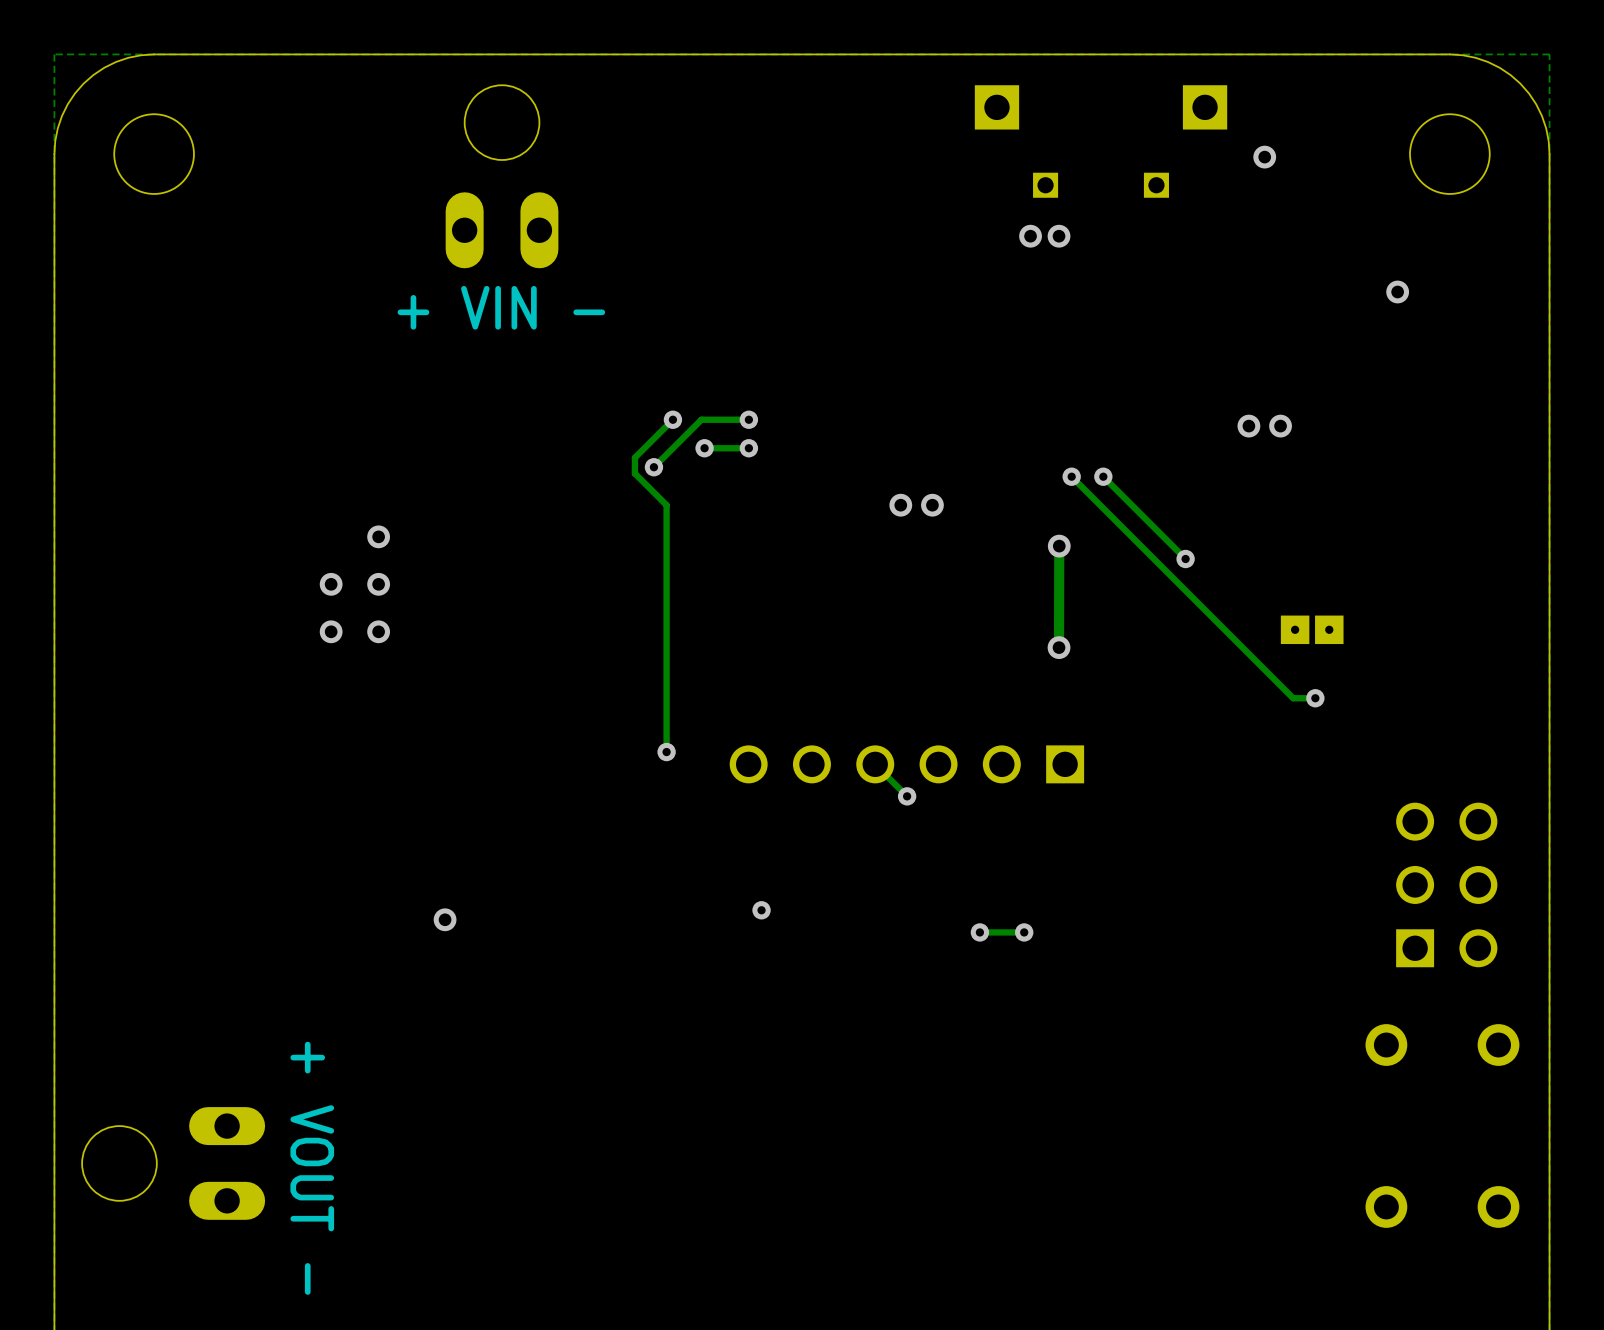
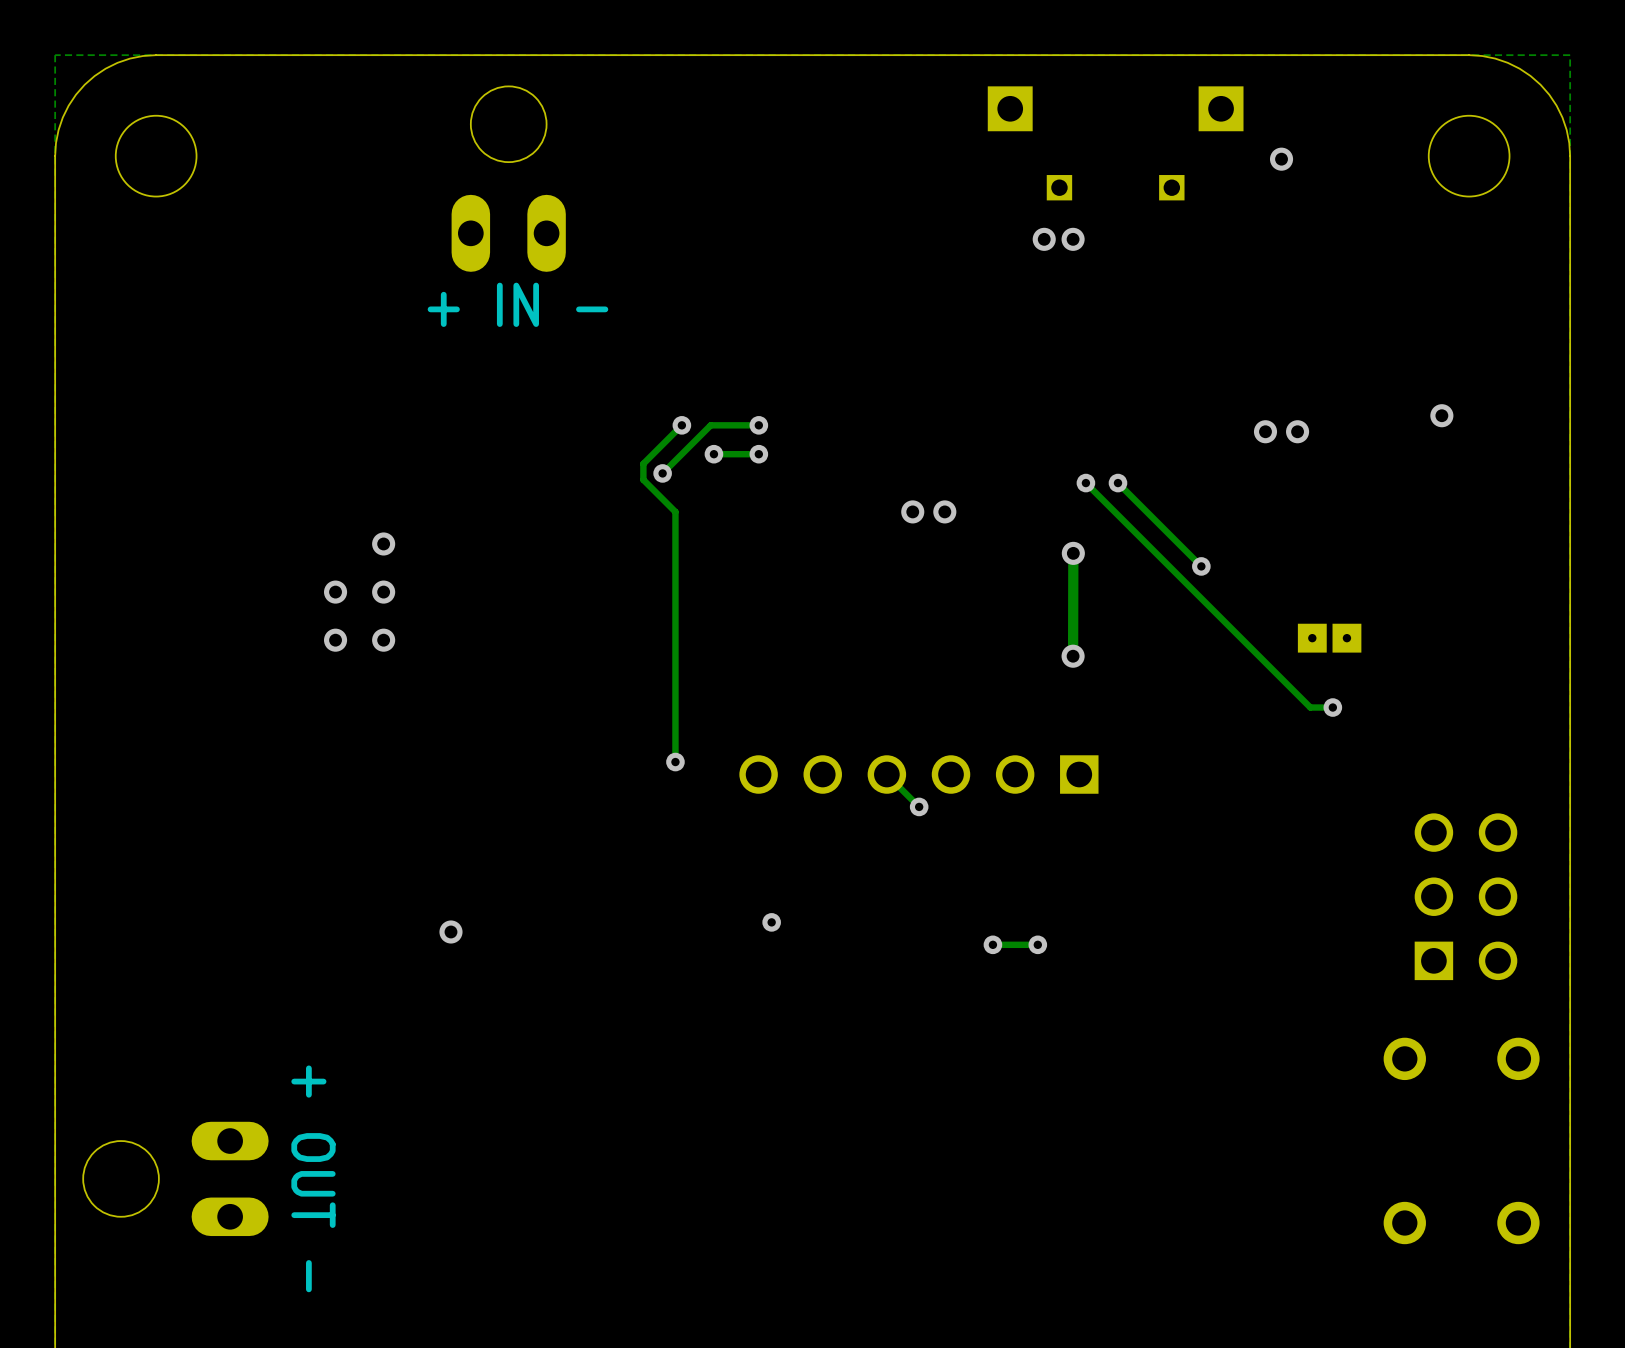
via position: (1397, 292) -> (1441, 415)
text: + VIN - (501, 307) -> + IN - (517, 304)
text: + VOUT - (312, 1168) -> + OUT - (313, 1178)

